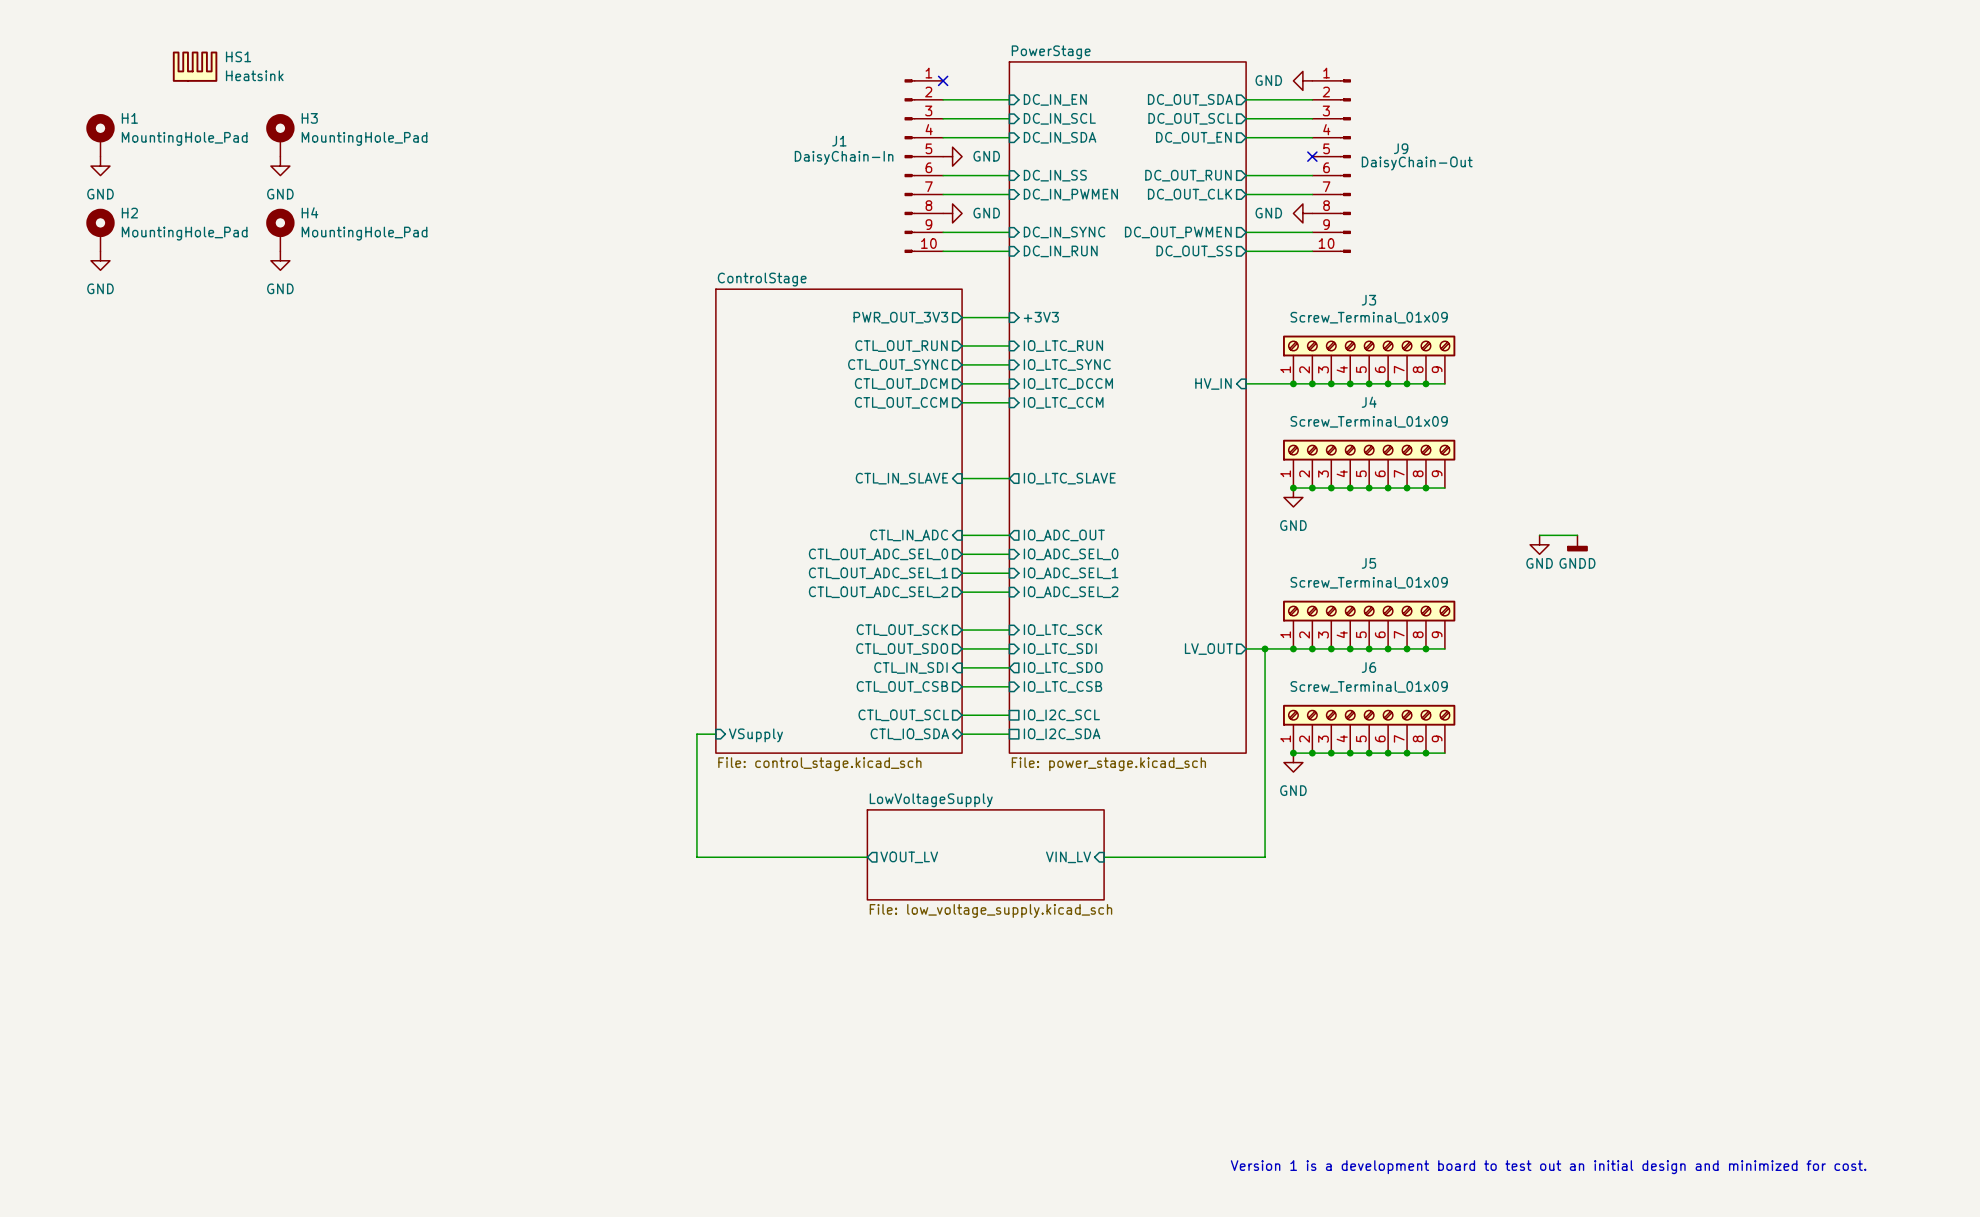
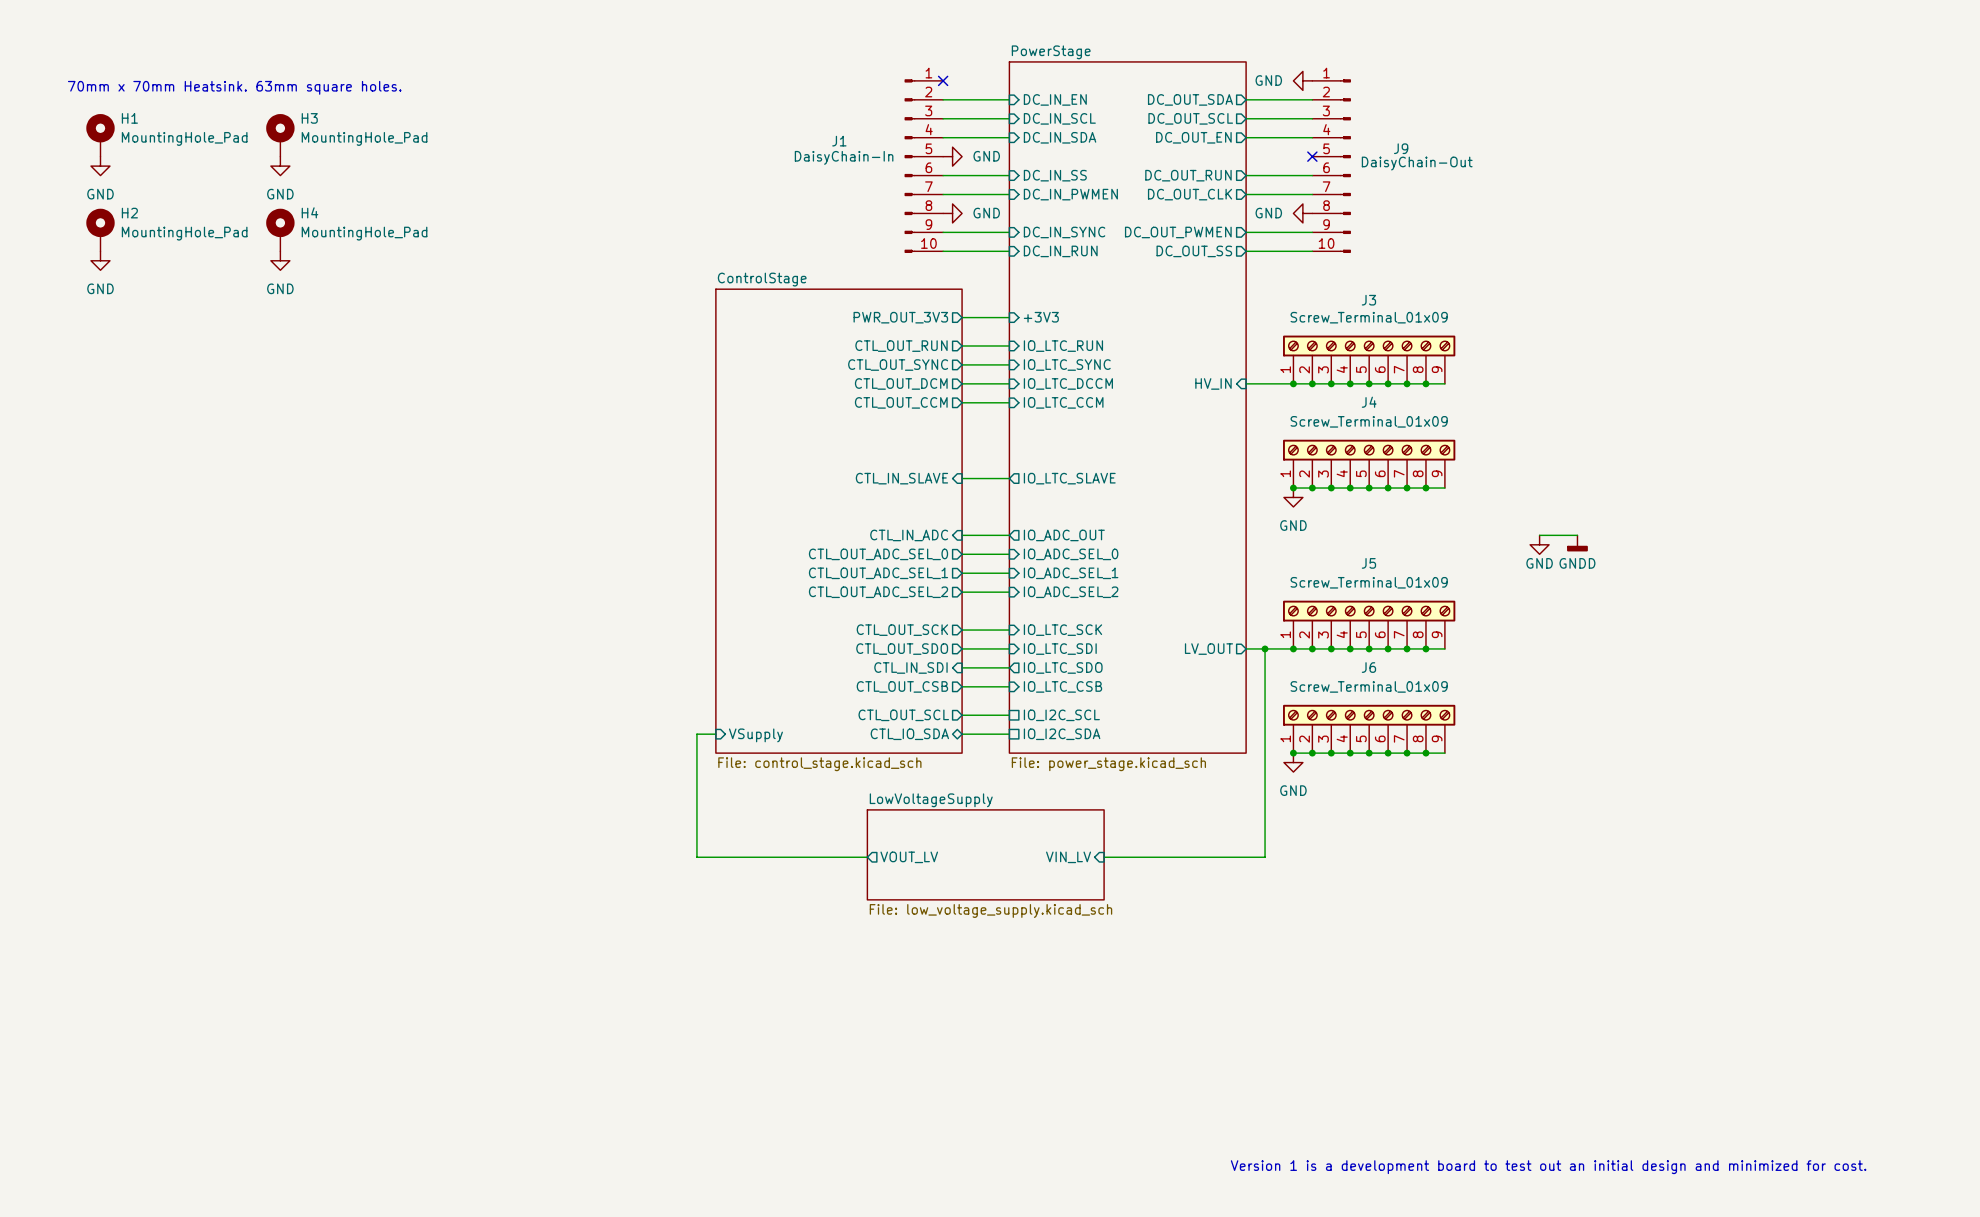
HS1: Heatsink (195, 66) -> none
text: none -> 70mm x 70mm Heatsink. 63mm square holes. (234, 87)

